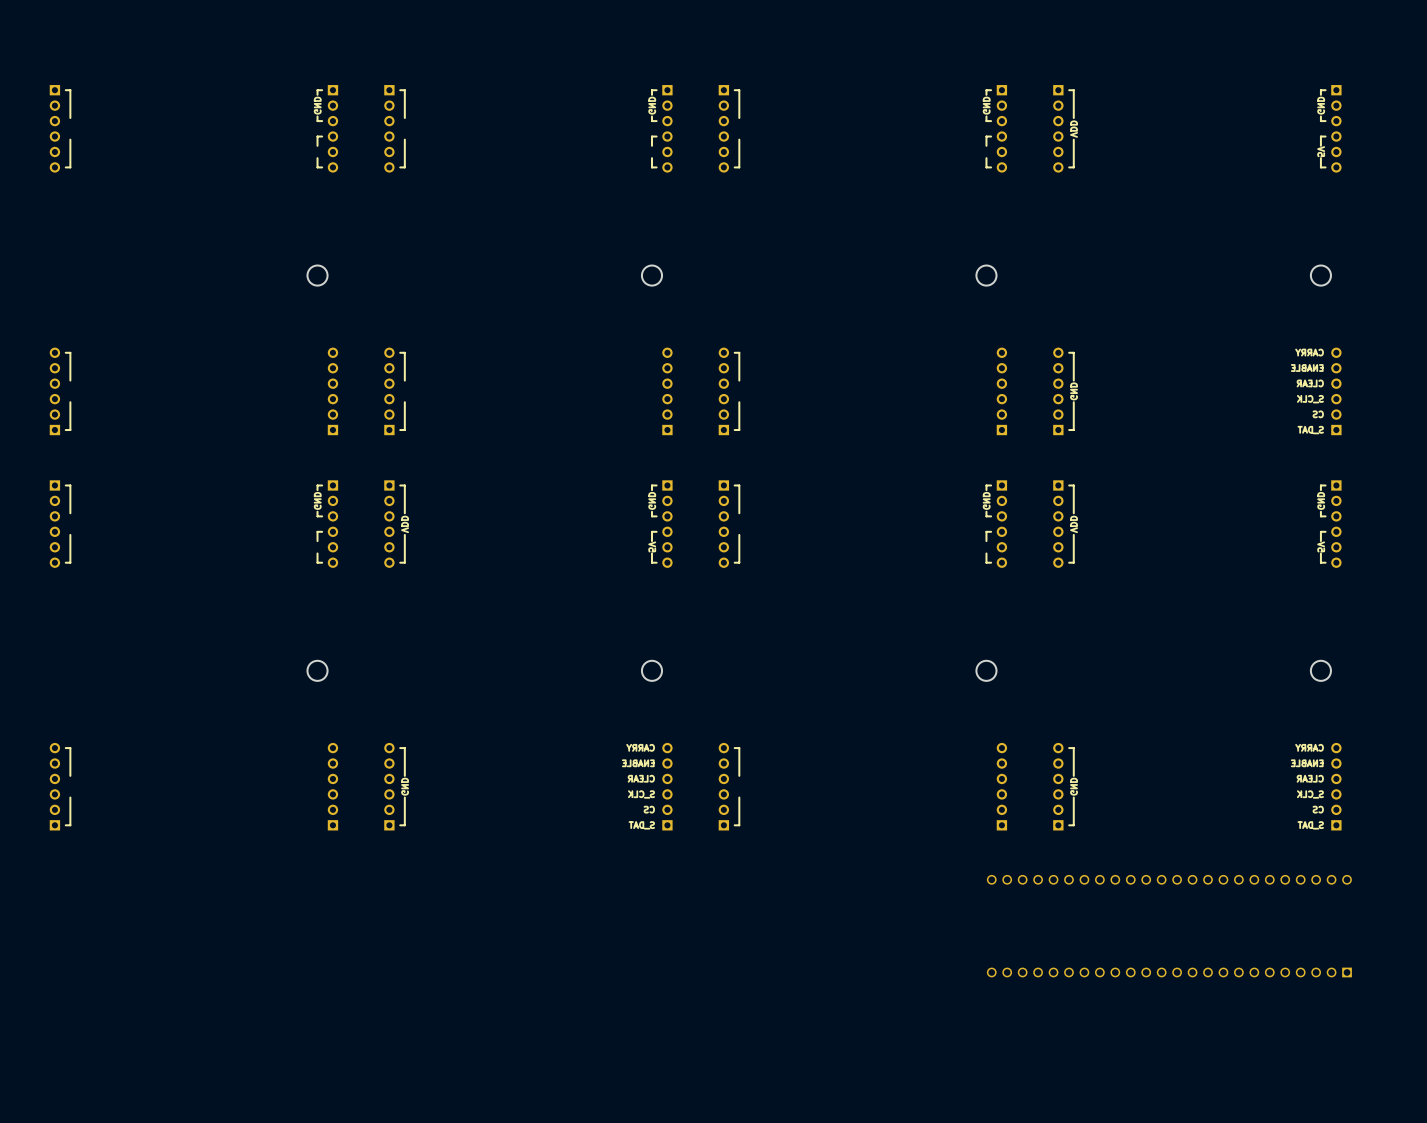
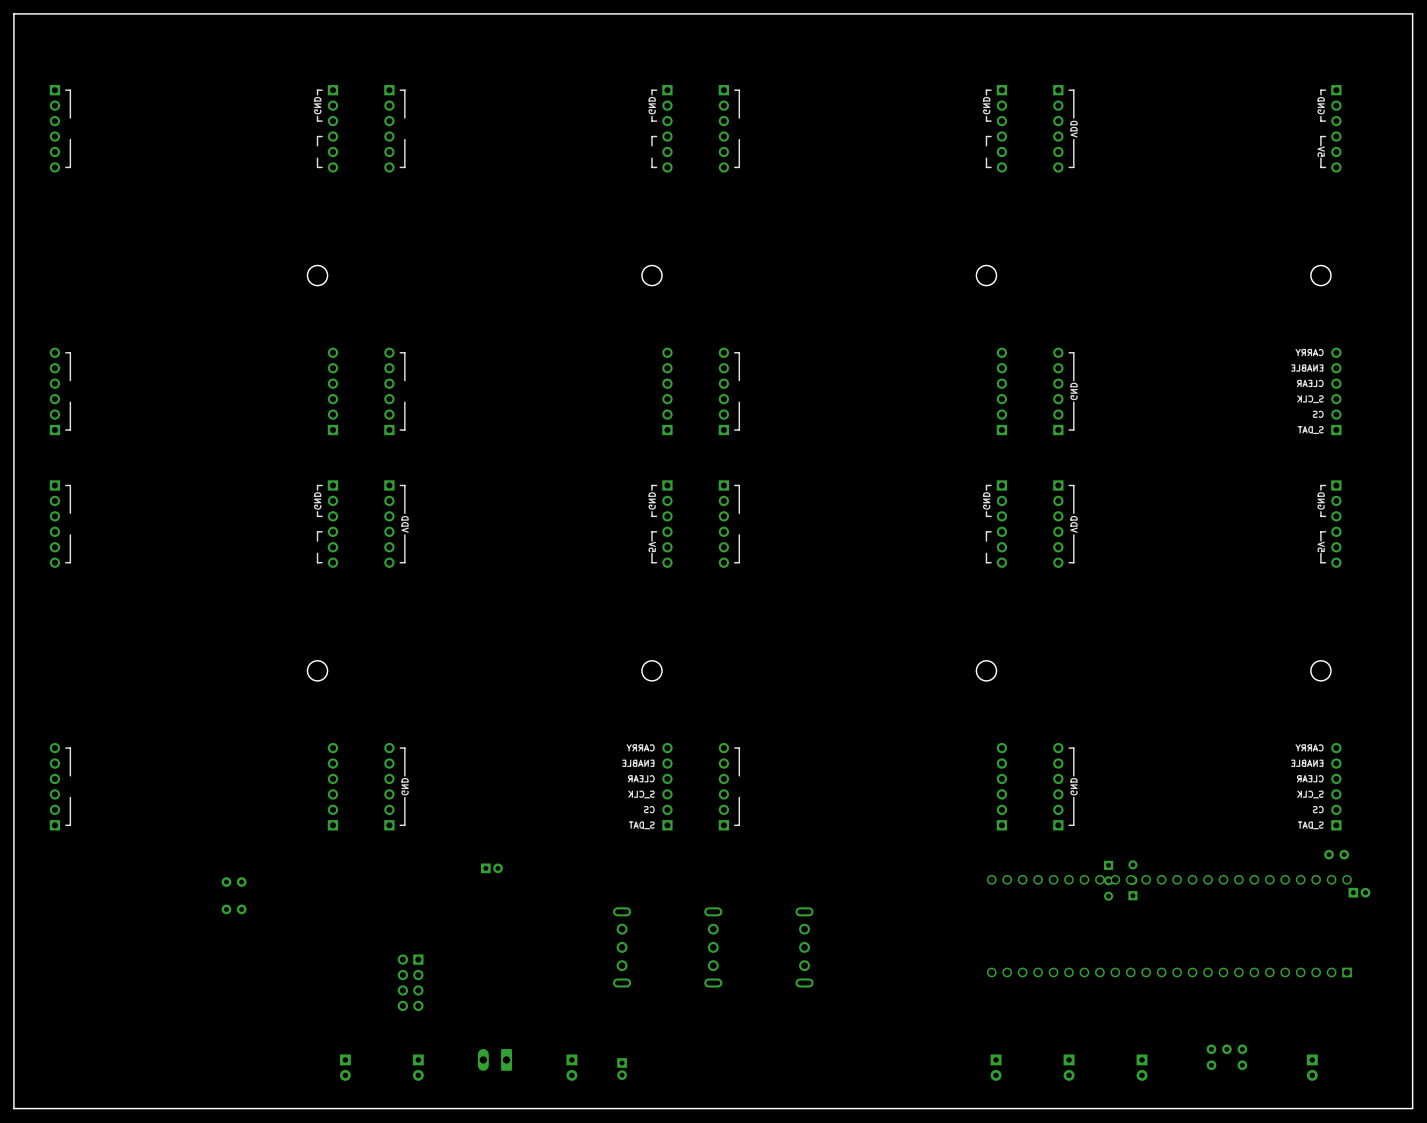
board edge: none -> (1412, 13) (1412, 1108) (13, 1108) (13, 13) (1412, 13)
part: none -> (1336, 854)
part: none -> (491, 868)
part: none -> (1108, 880)
part: none -> (1132, 880)
part: none -> (234, 882)
part: none -> (1359, 892)
part: none -> (234, 909)
part: none -> (622, 947)
part: none -> (713, 947)
part: none -> (804, 947)
part: none -> (410, 982)
part: none -> (1226, 1057)
part: none -> (494, 1059)
part: none -> (345, 1067)
part: none -> (418, 1067)
part: none -> (571, 1067)
part: none -> (996, 1067)
part: none -> (1069, 1067)
part: none -> (1142, 1067)
part: none -> (1312, 1067)
part: none -> (622, 1069)

